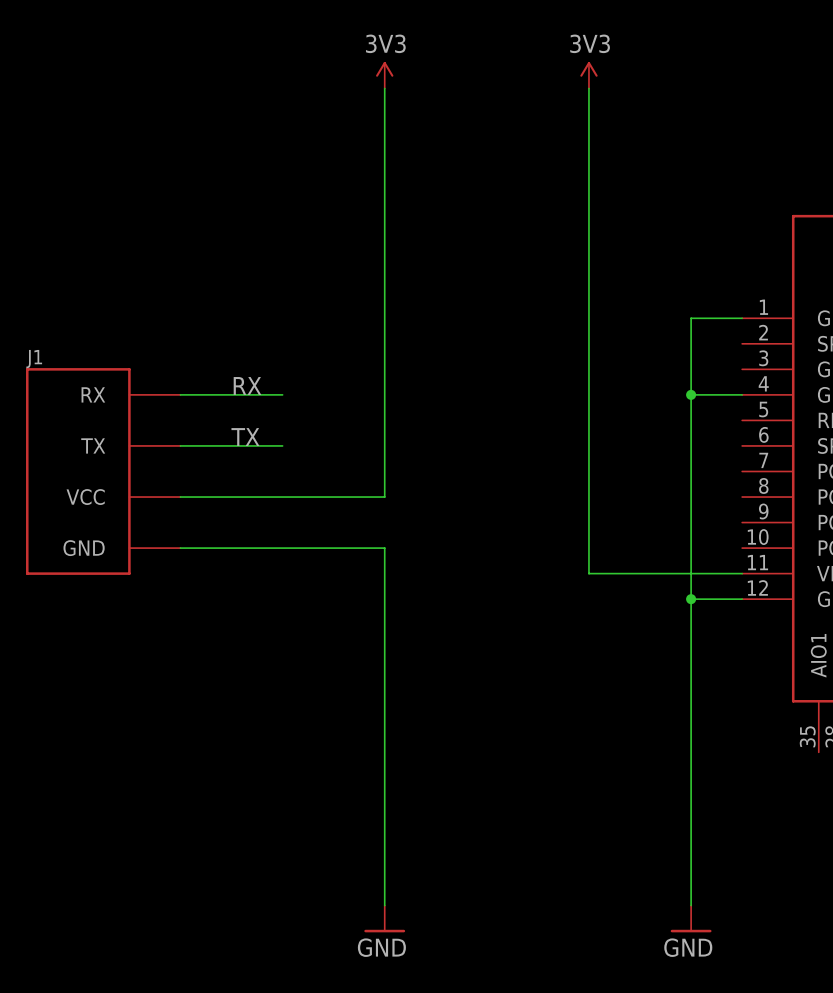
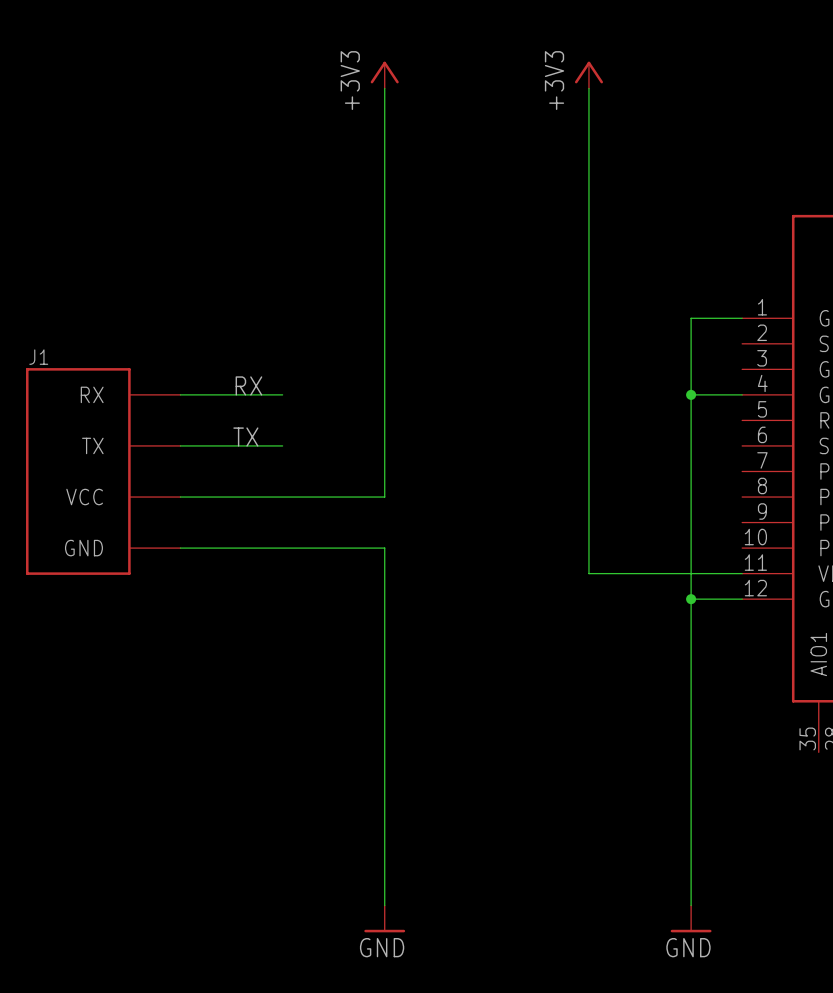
power symbol: 3V3 (384, 75) -> +3V3 (384, 75)
power symbol: 3V3 (588, 75) -> +3V3 (588, 75)

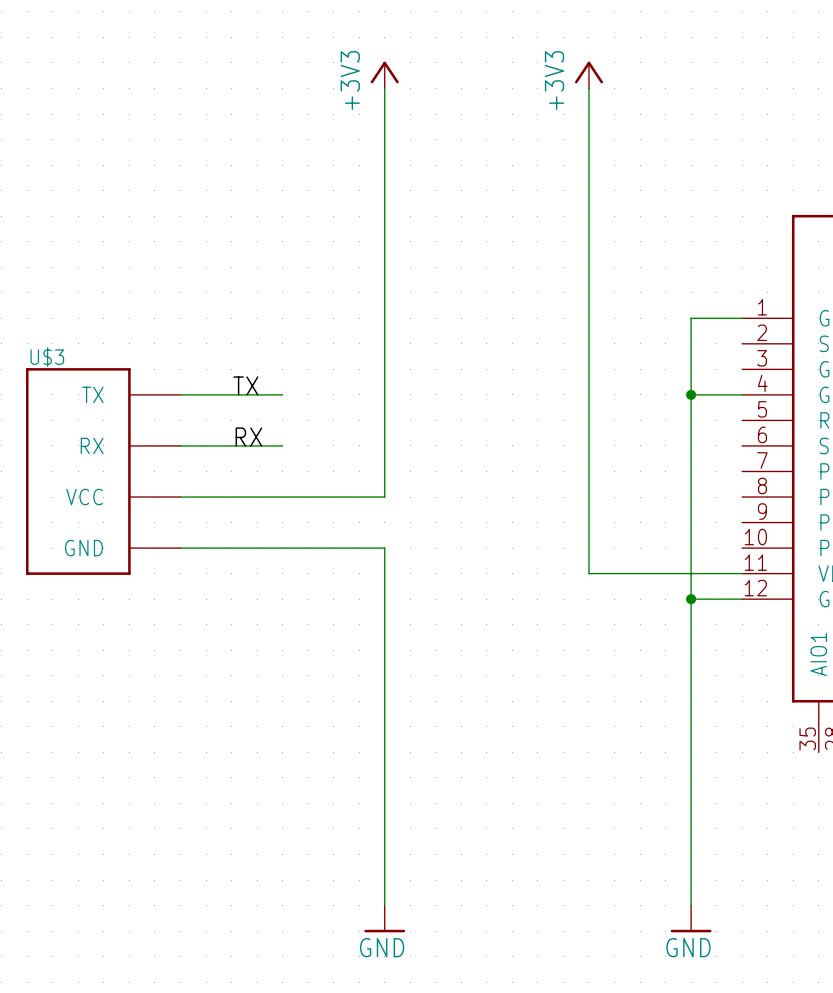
J1 name: J1 (38, 357) -> U$3 (47, 357)
label: RX (248, 385) -> TX (245, 385)
J1 pin name: RX (92, 394) -> TX (92, 394)
label: TX (245, 437) -> RX (248, 437)
J1 pin name: TX (92, 445) -> RX (92, 445)

